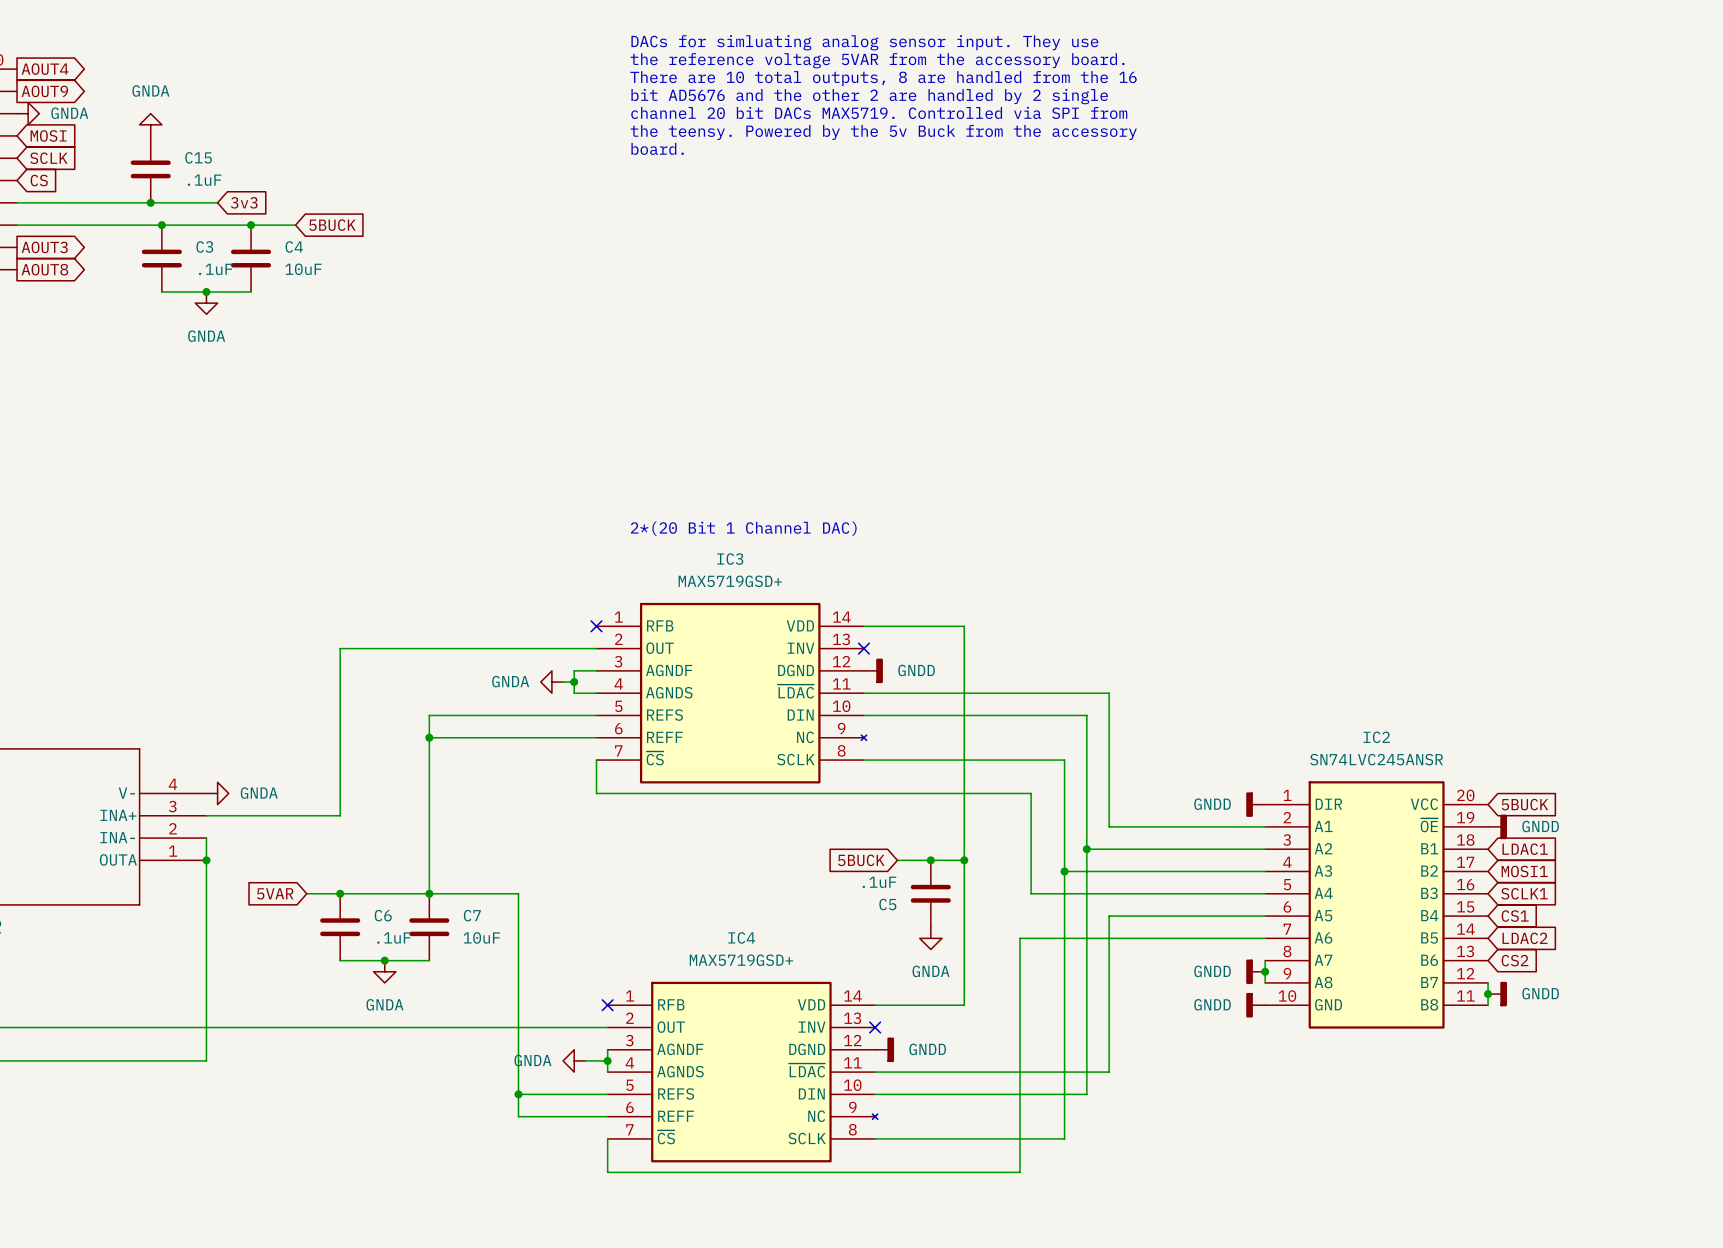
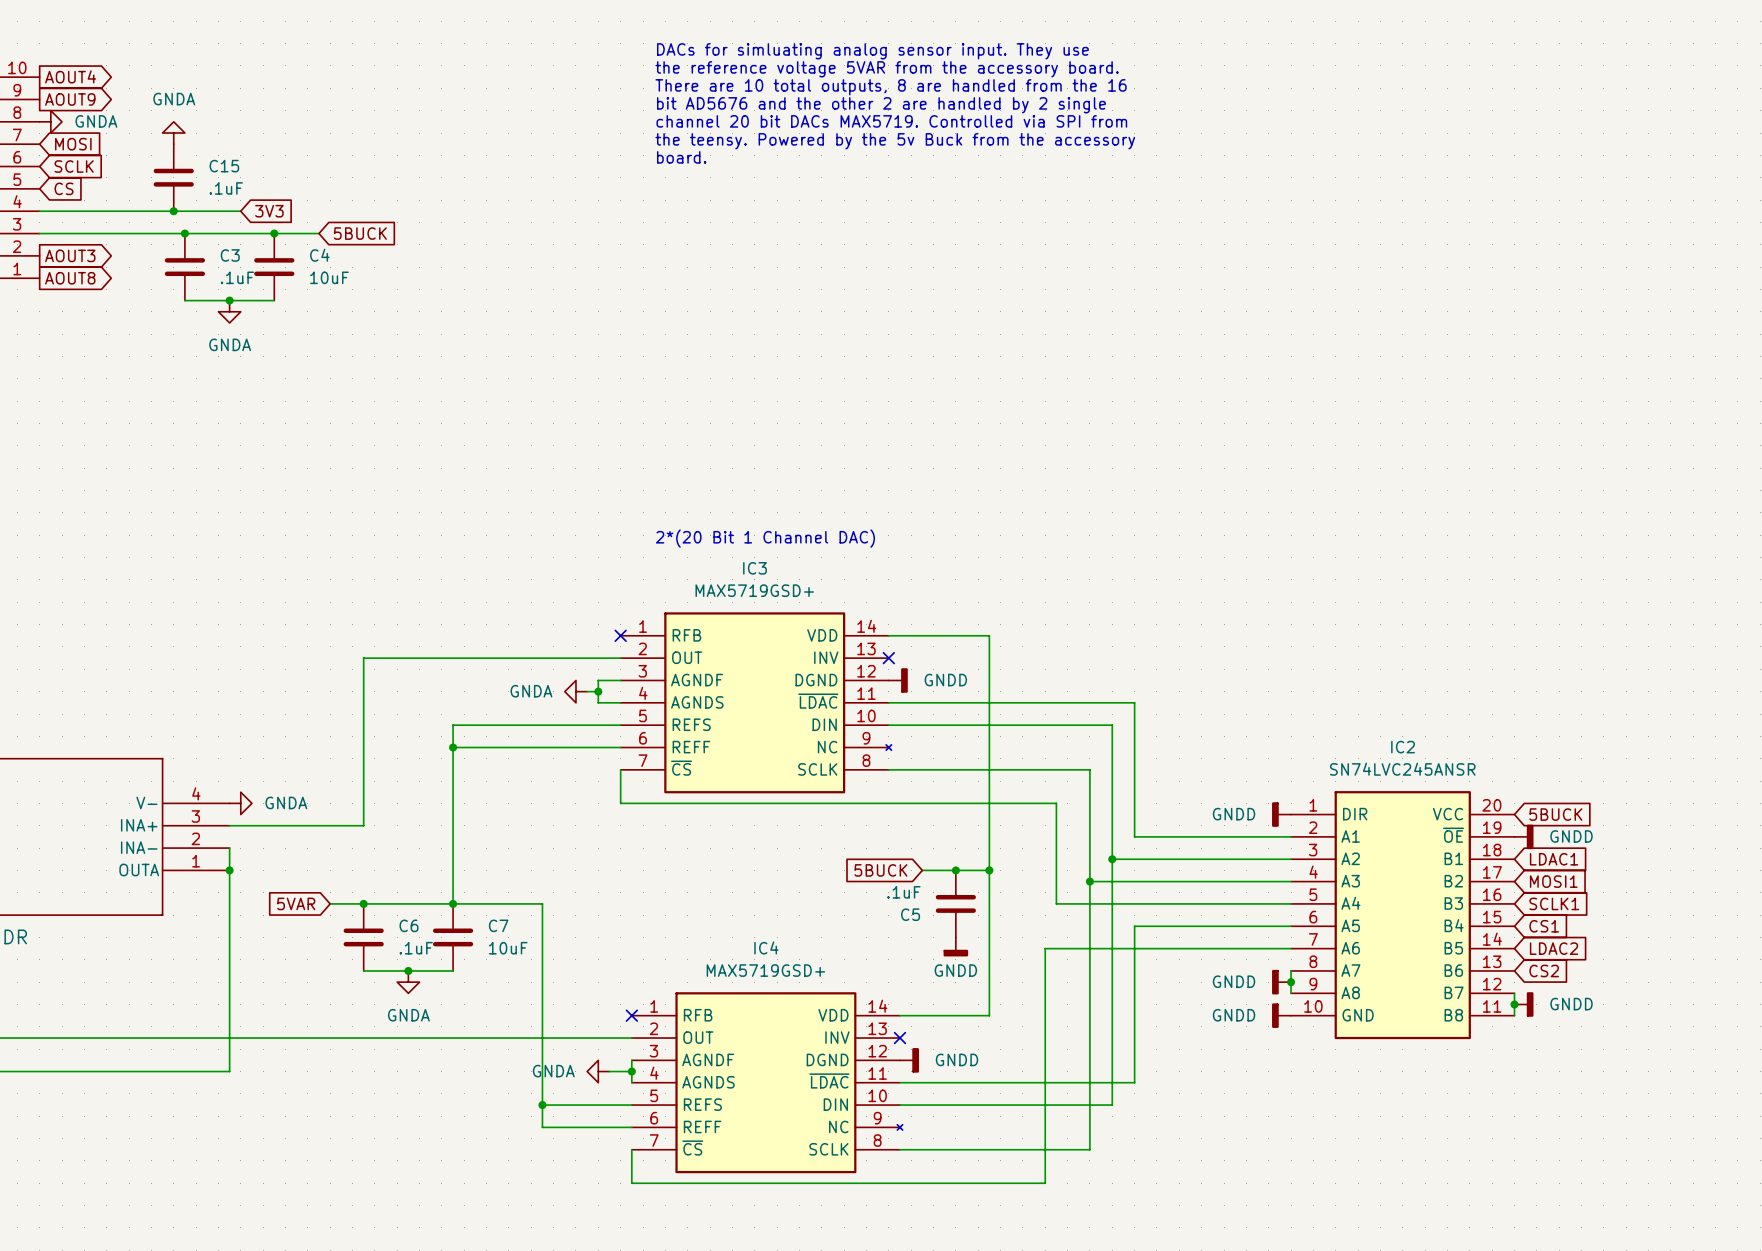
global label: 3v3 (244, 202) -> 3V3 (269, 211)
power symbol: GNDA (930, 938) -> GNDD (955, 946)

